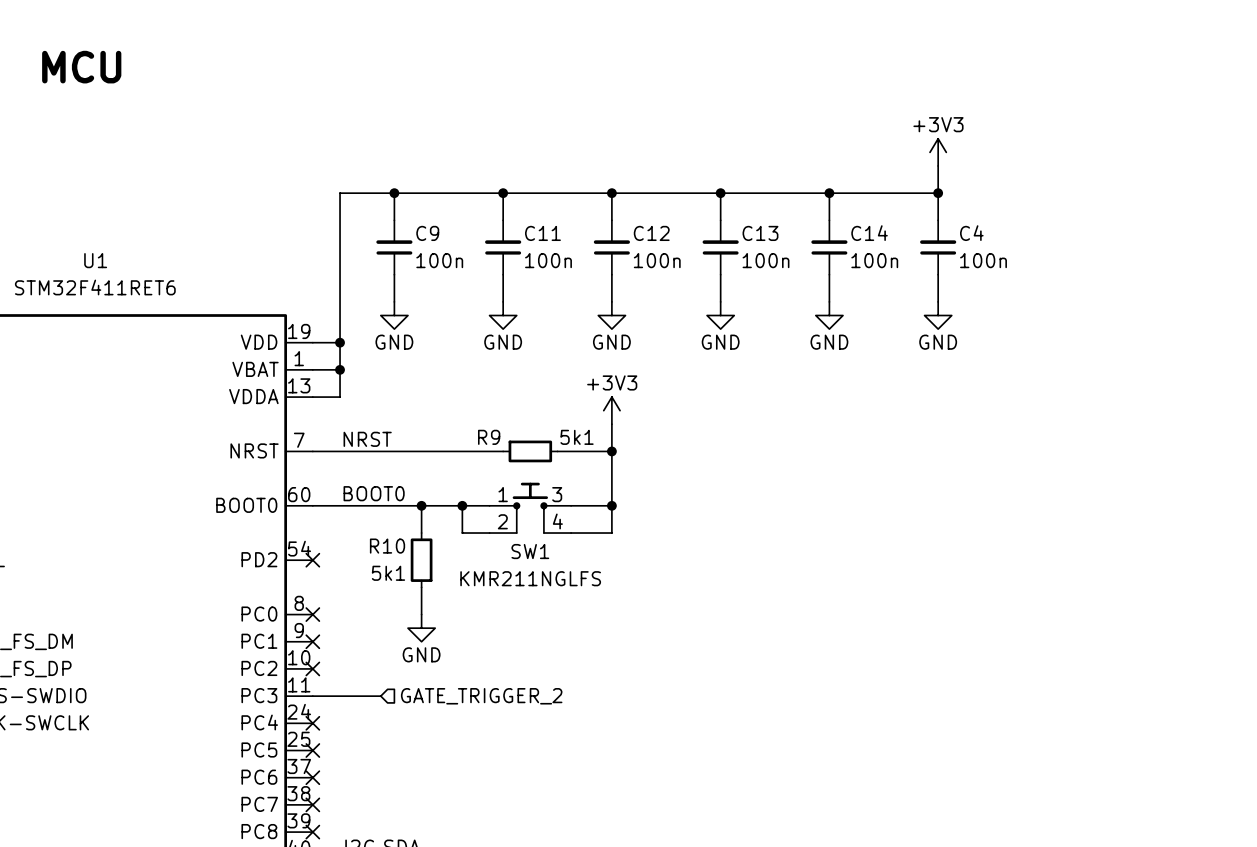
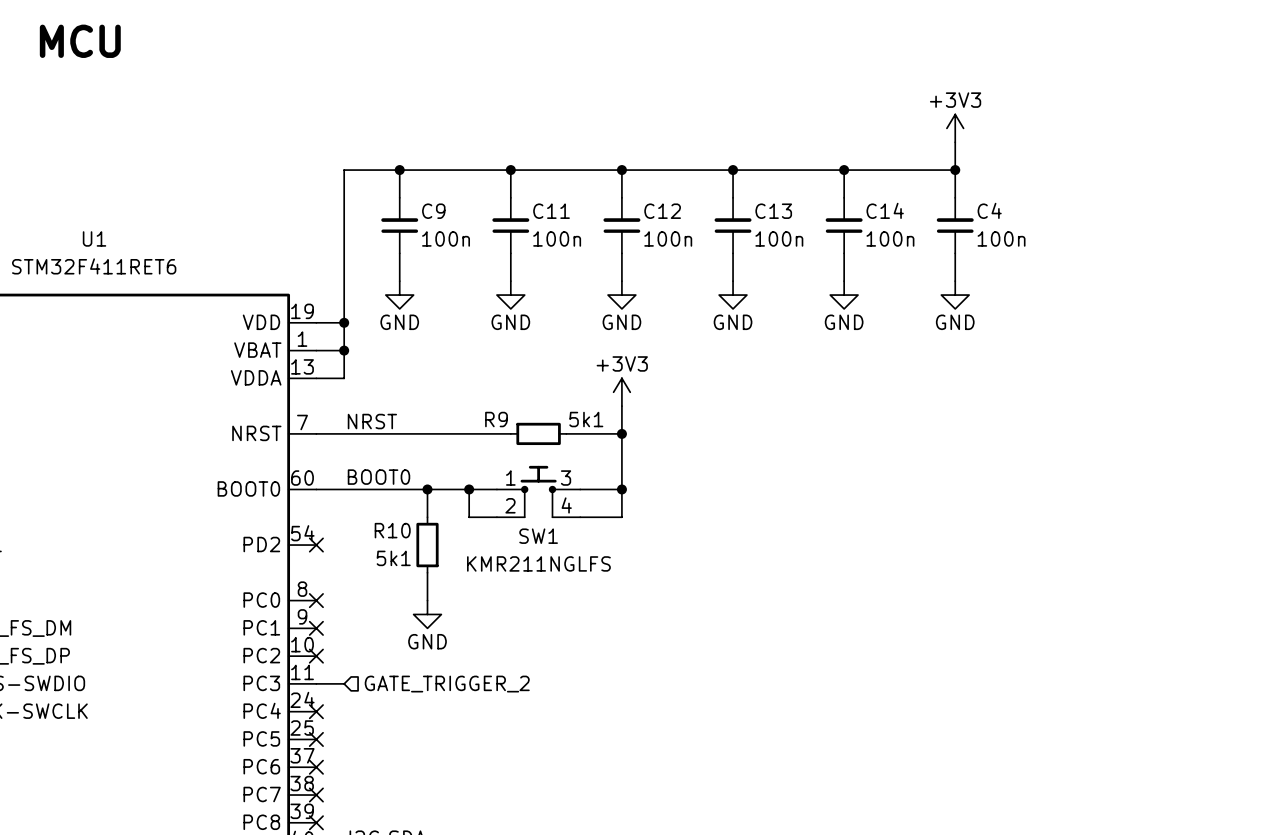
wire: (340, 696) (380, 696) -> none
hierarchical label position: GATE_TRIGGER_2 (481, 696) -> GATE_TRIGGER_2 (447, 684)

